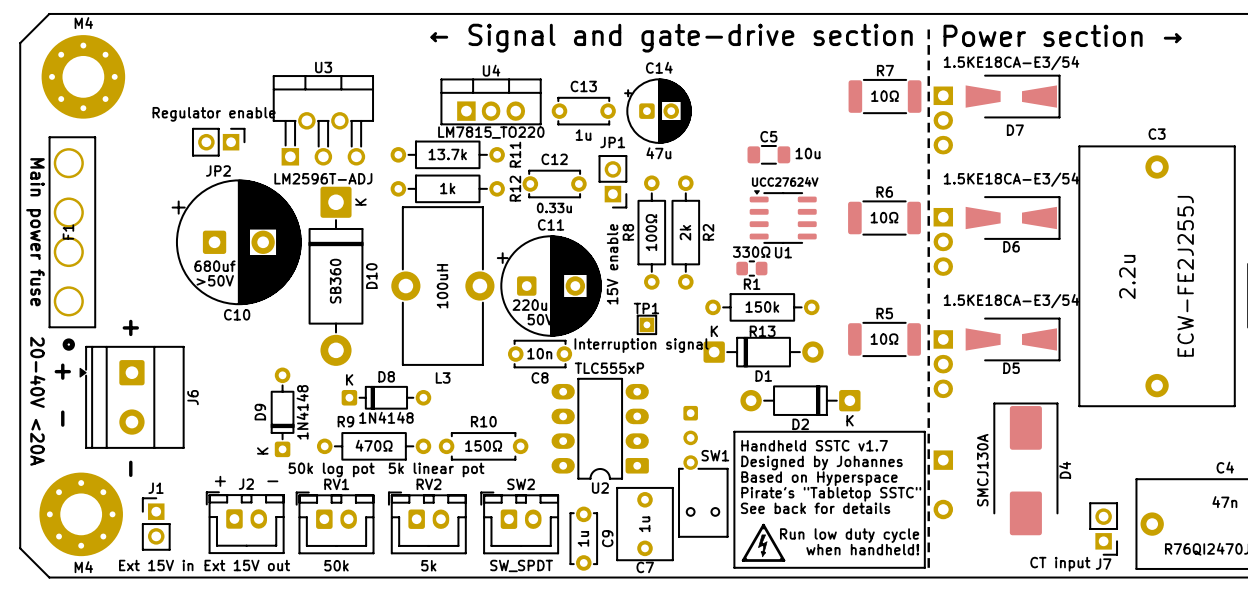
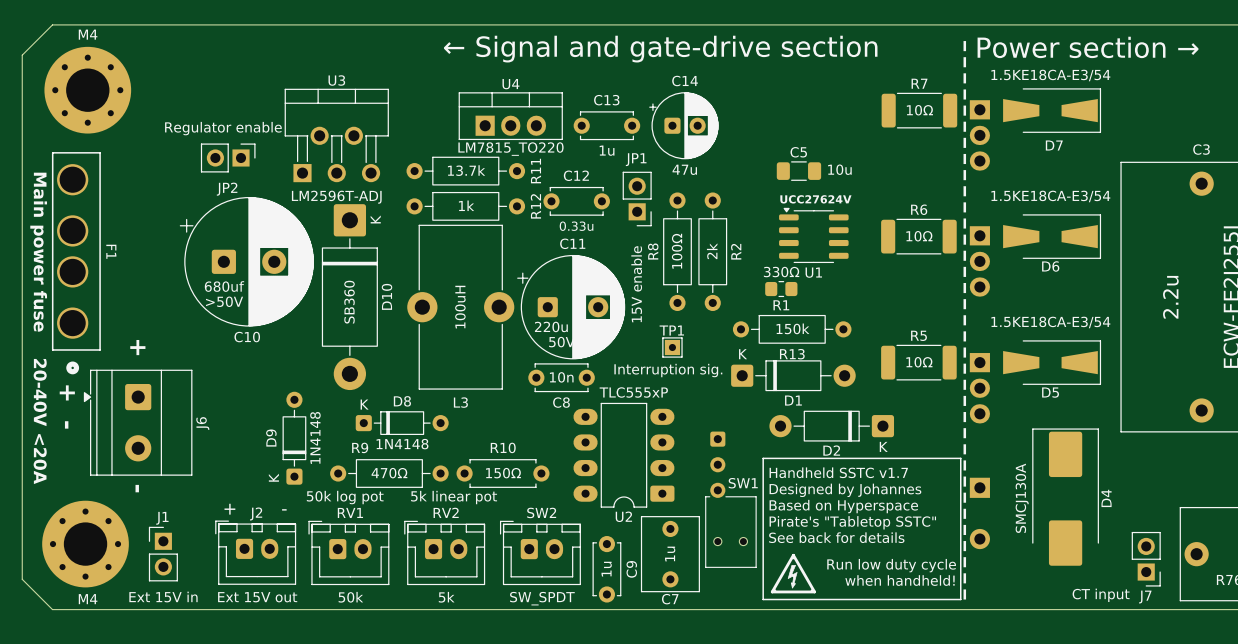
F1 name rotation: 0° (68, 232) -> 180° (111, 251)
F1 name position: F1 (68, 232) -> F1 (111, 251)
TP1 value: Interruption signal (641, 345) -> Interruption sig. (668, 370)

